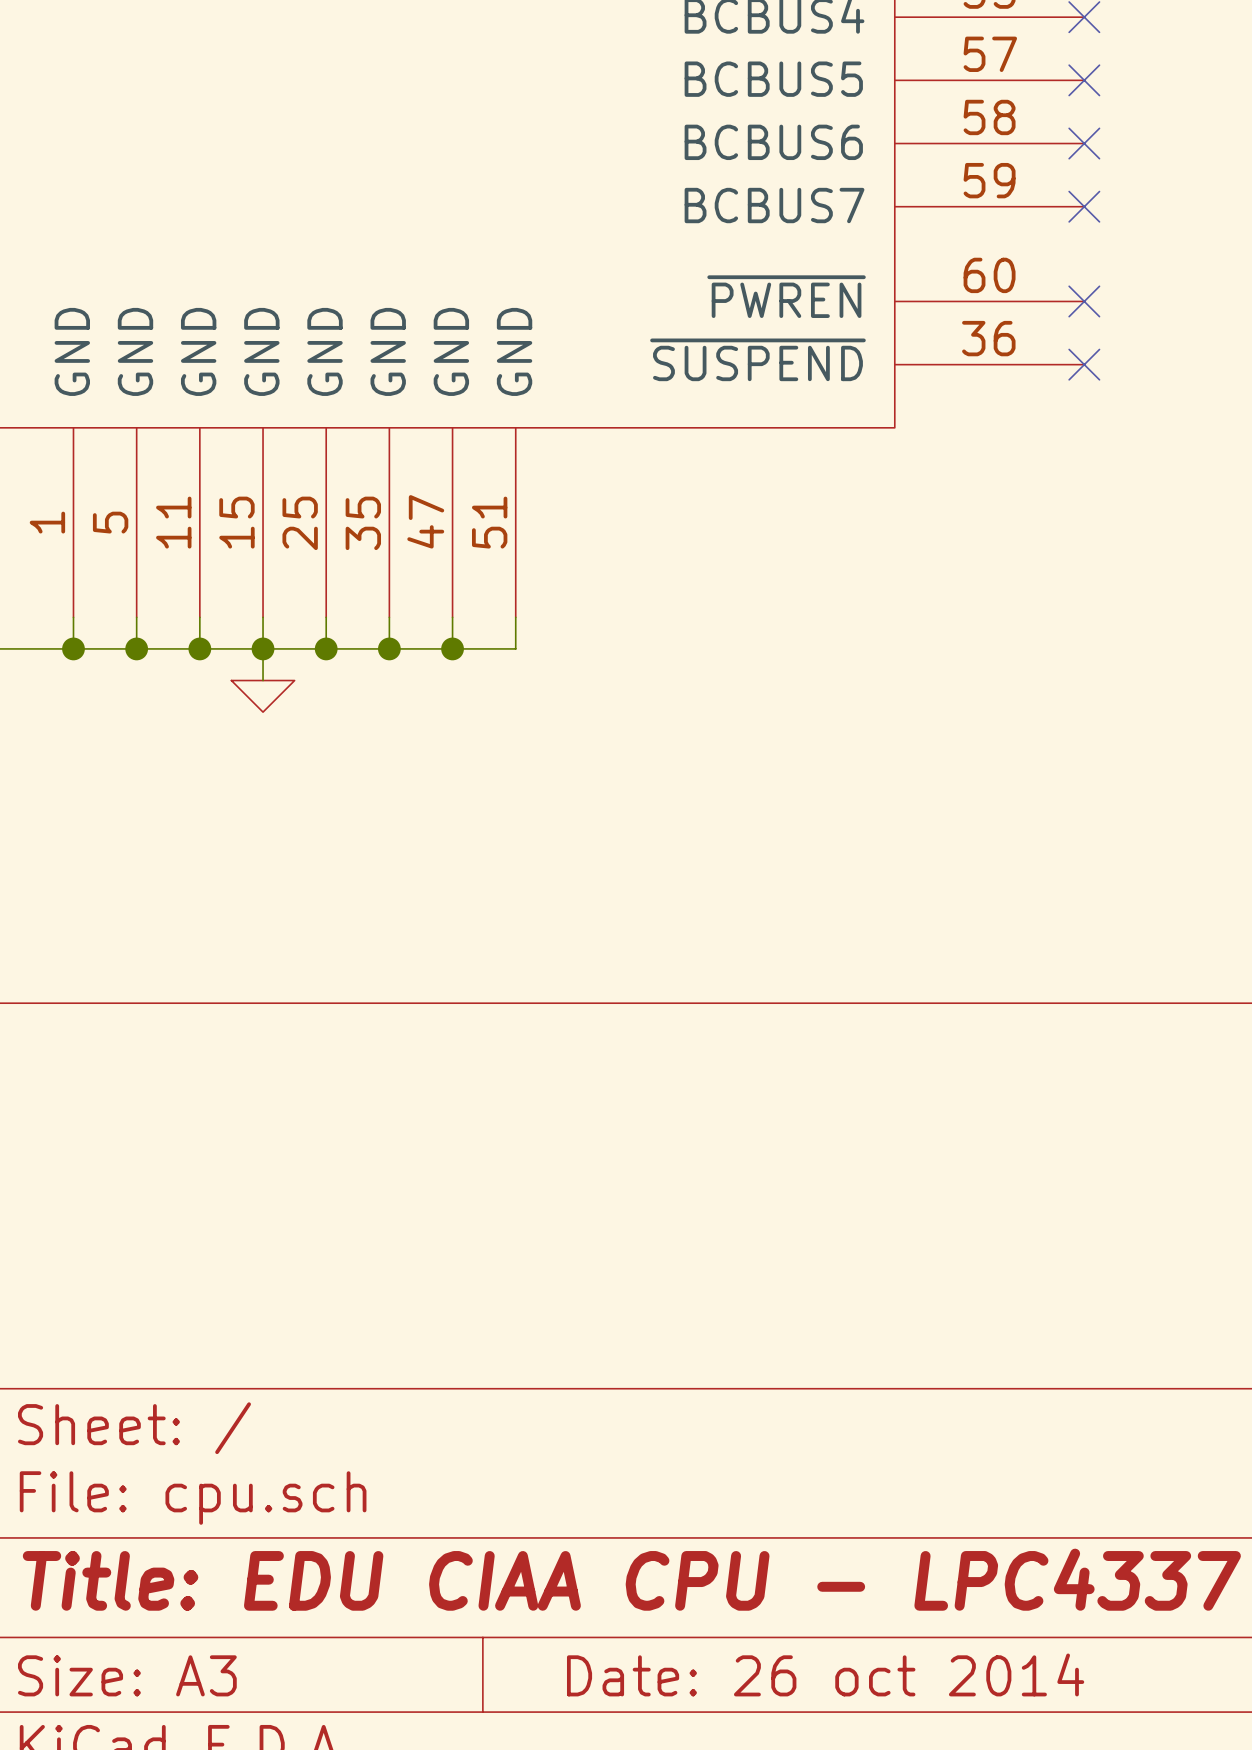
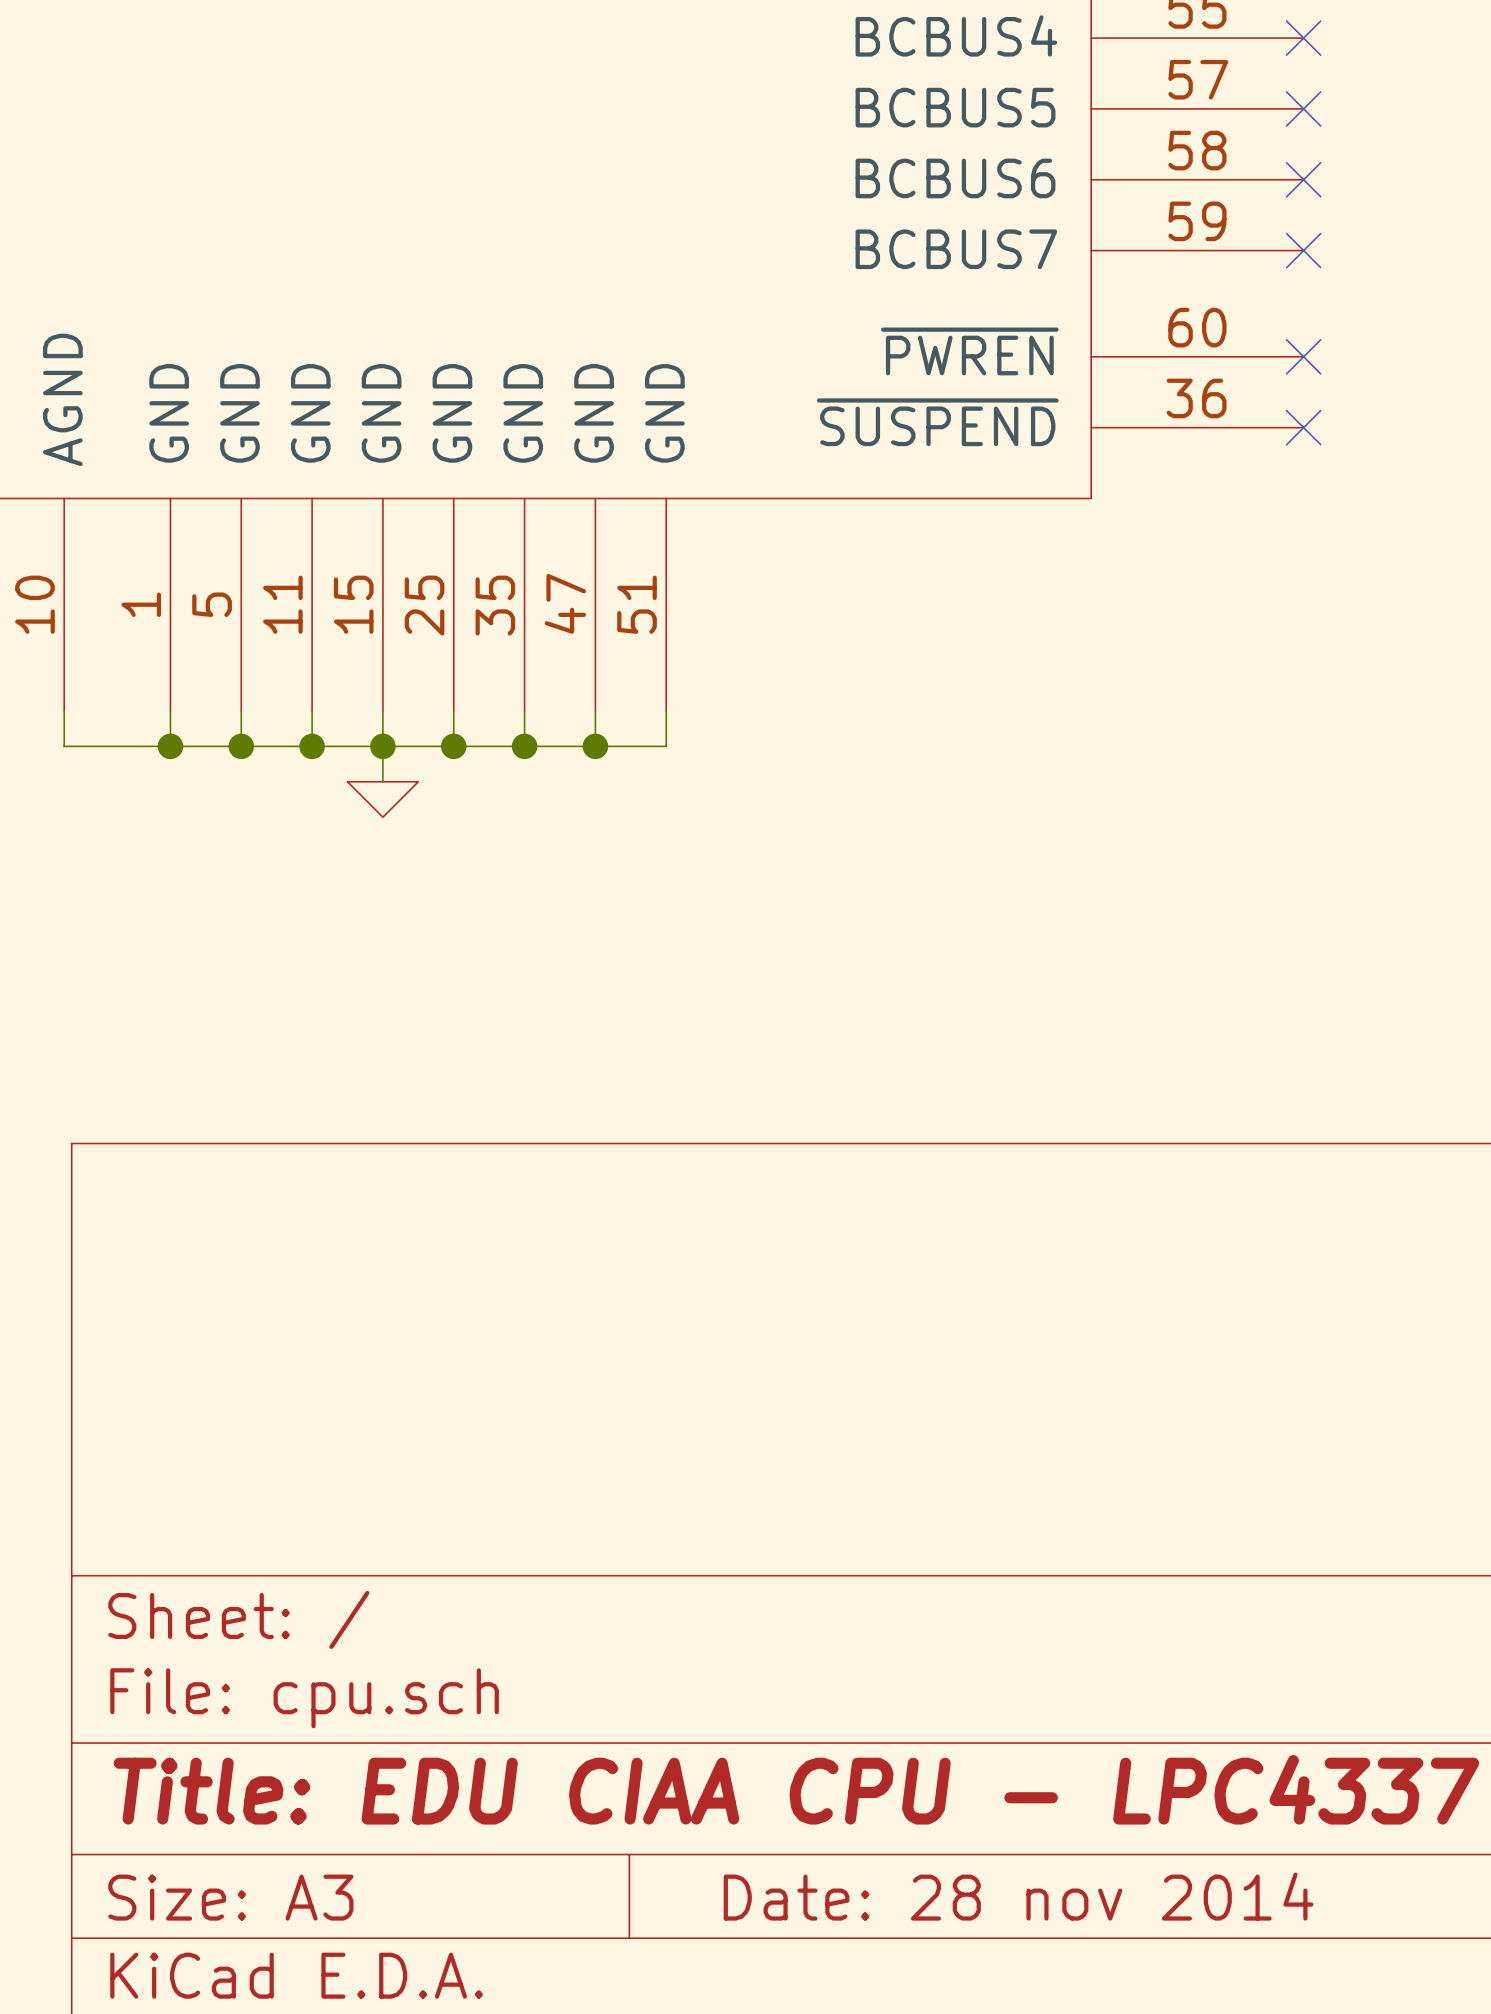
title block: Date: 26 oct 2014 (825, 1674) -> Date: 28 nov 2014 (1018, 1896)

